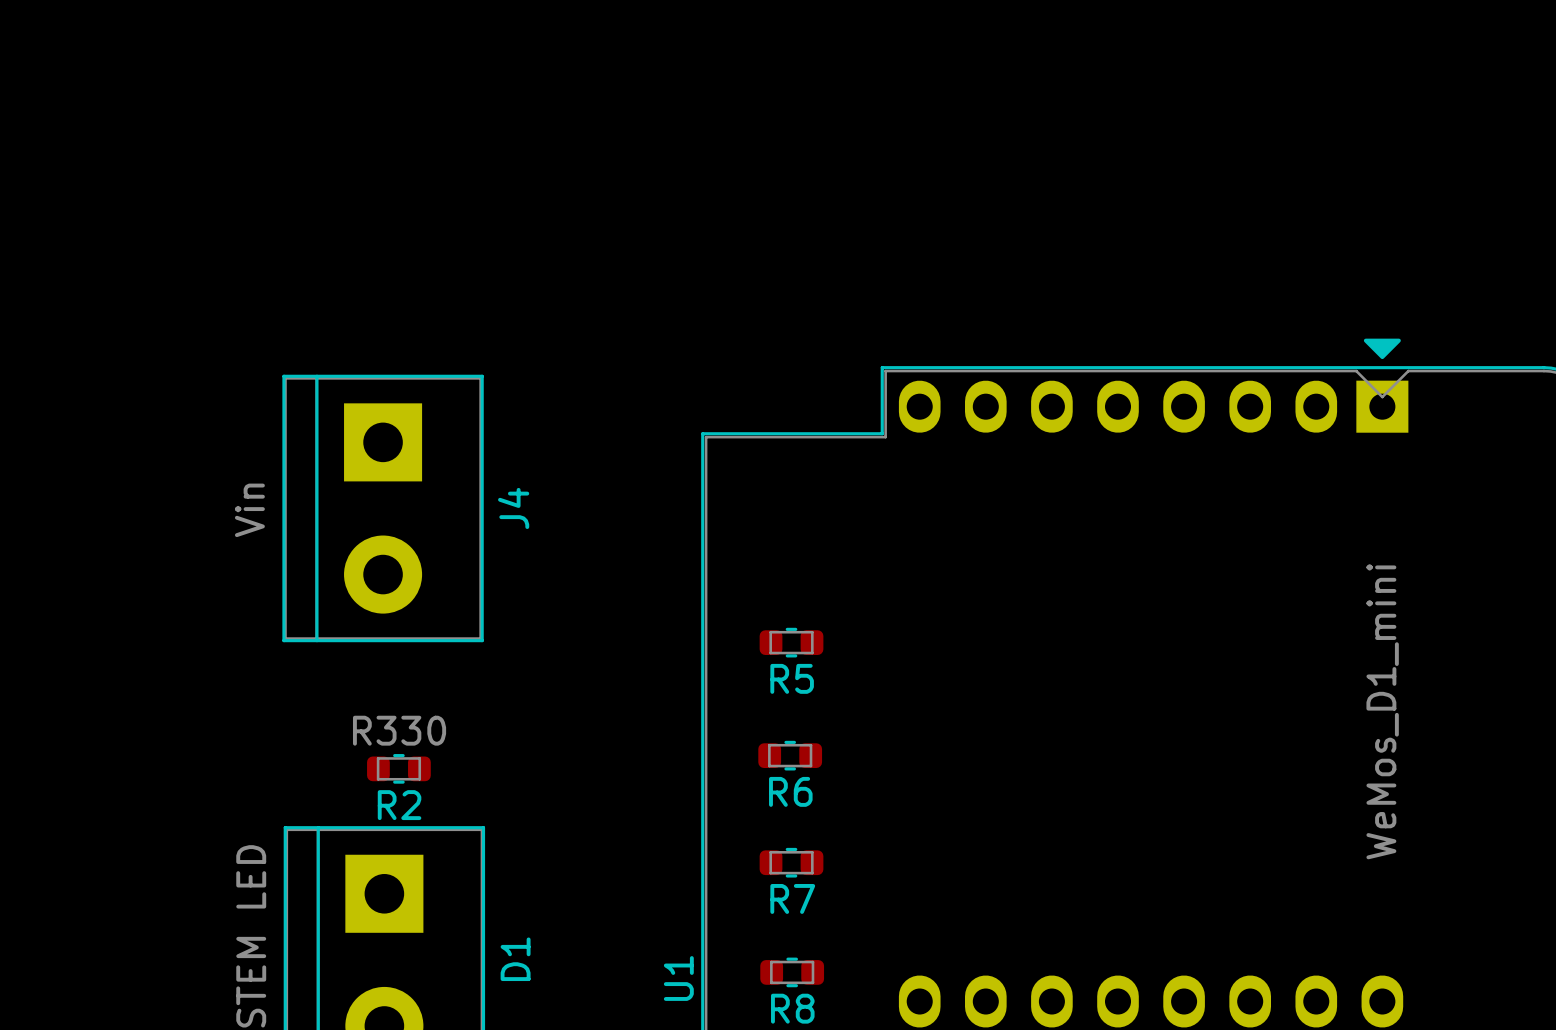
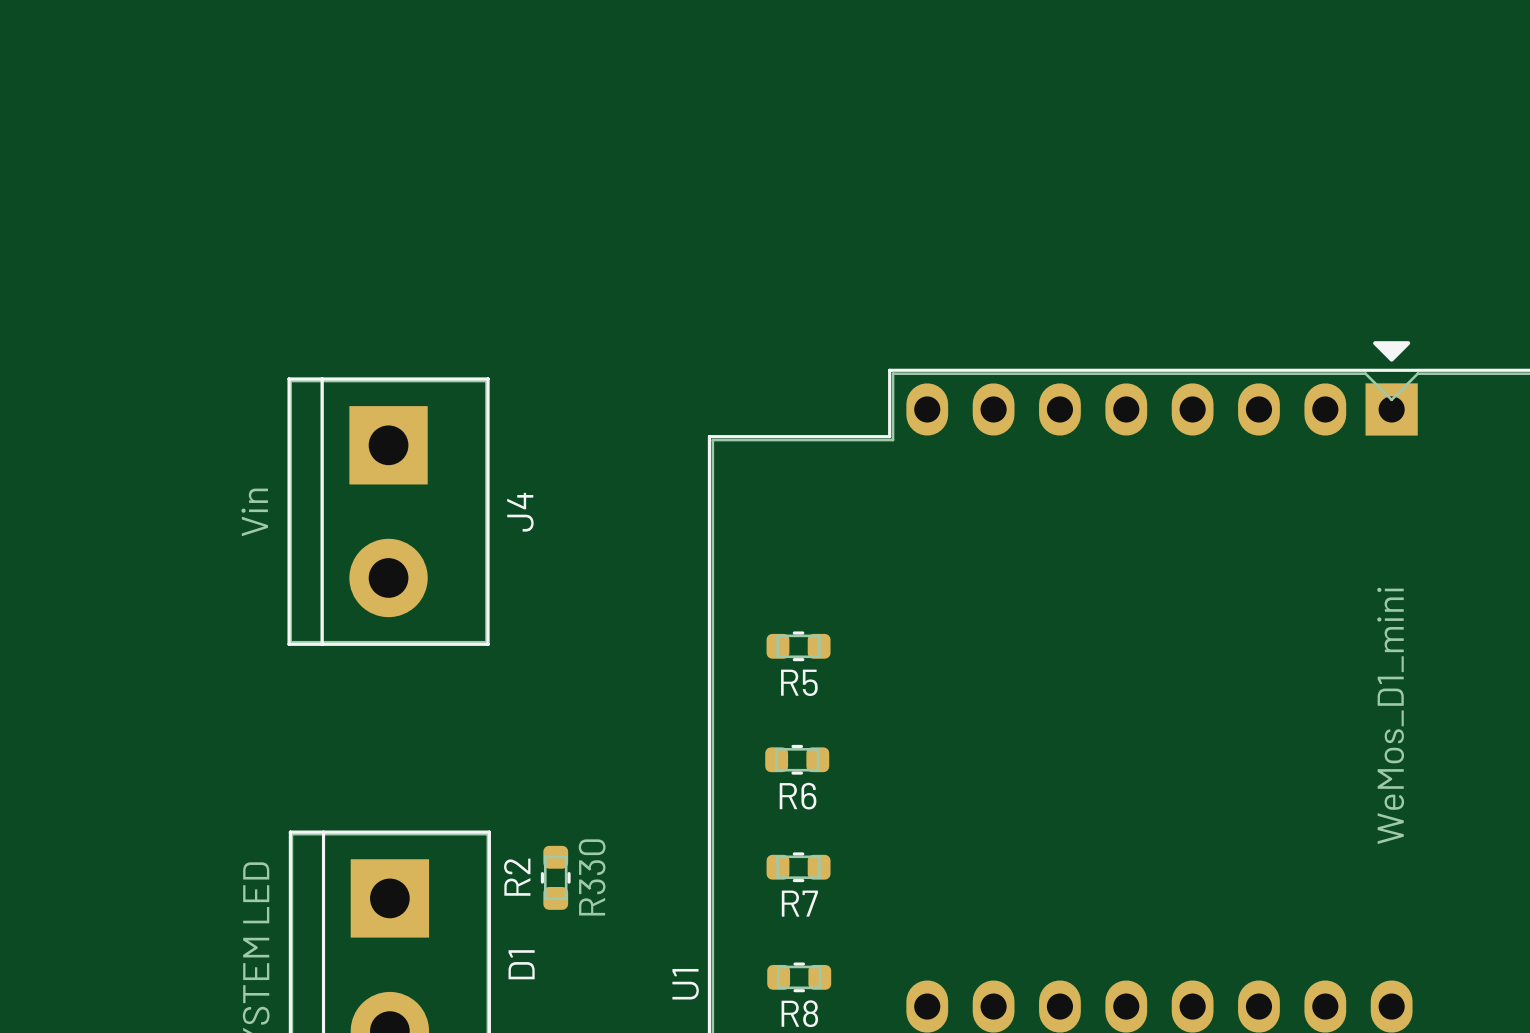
R2 rotation: 0° (398, 768) -> 90° clockwise (555, 877)
R2 position: (398, 768) -> (555, 877)

